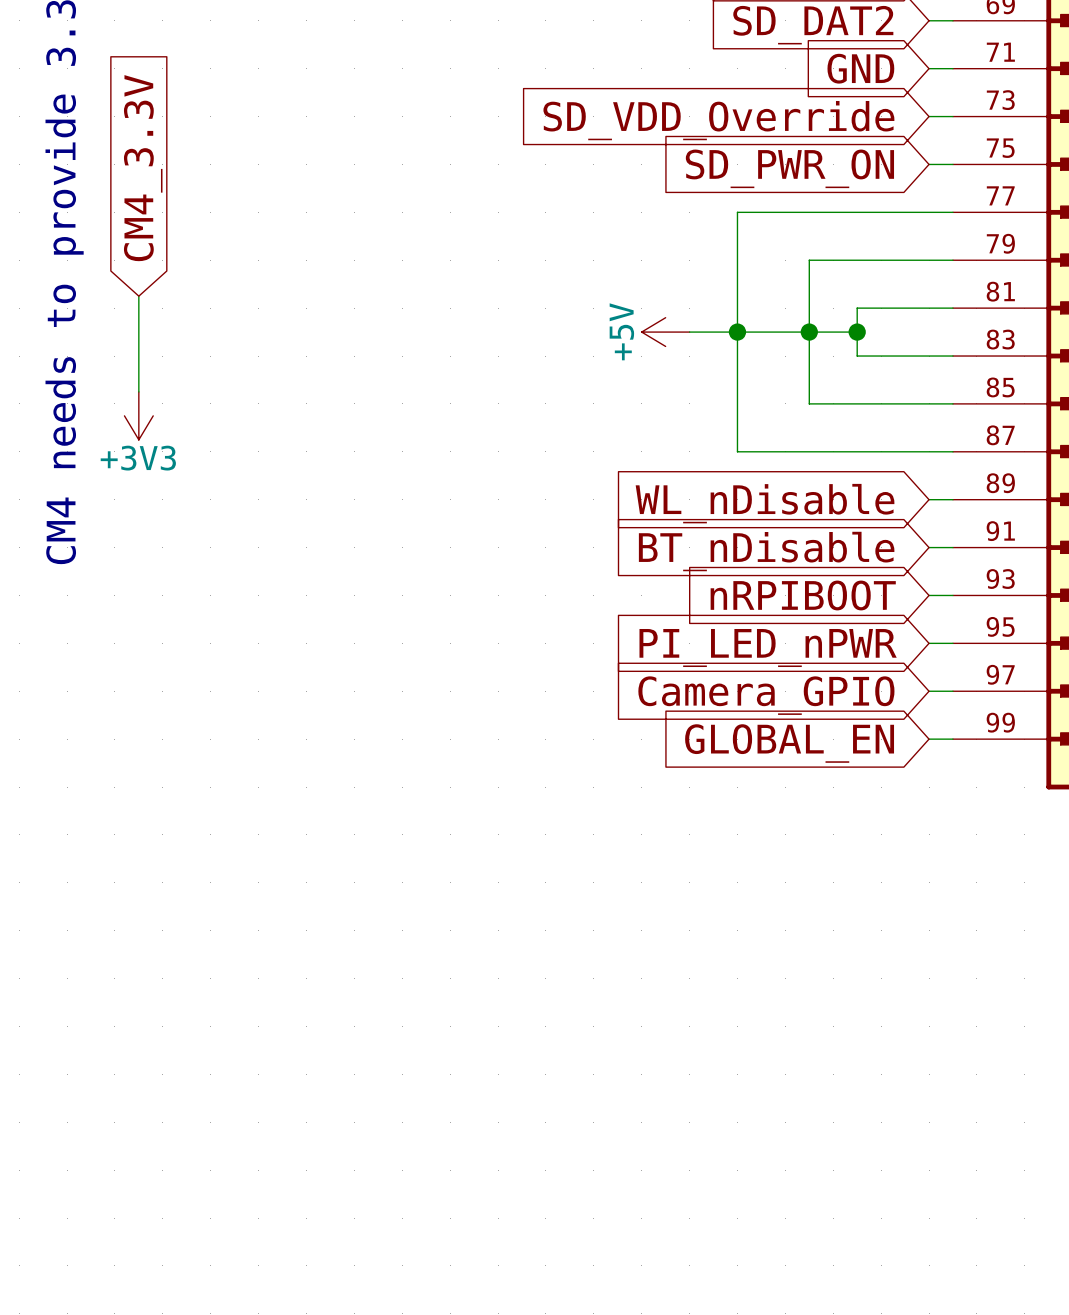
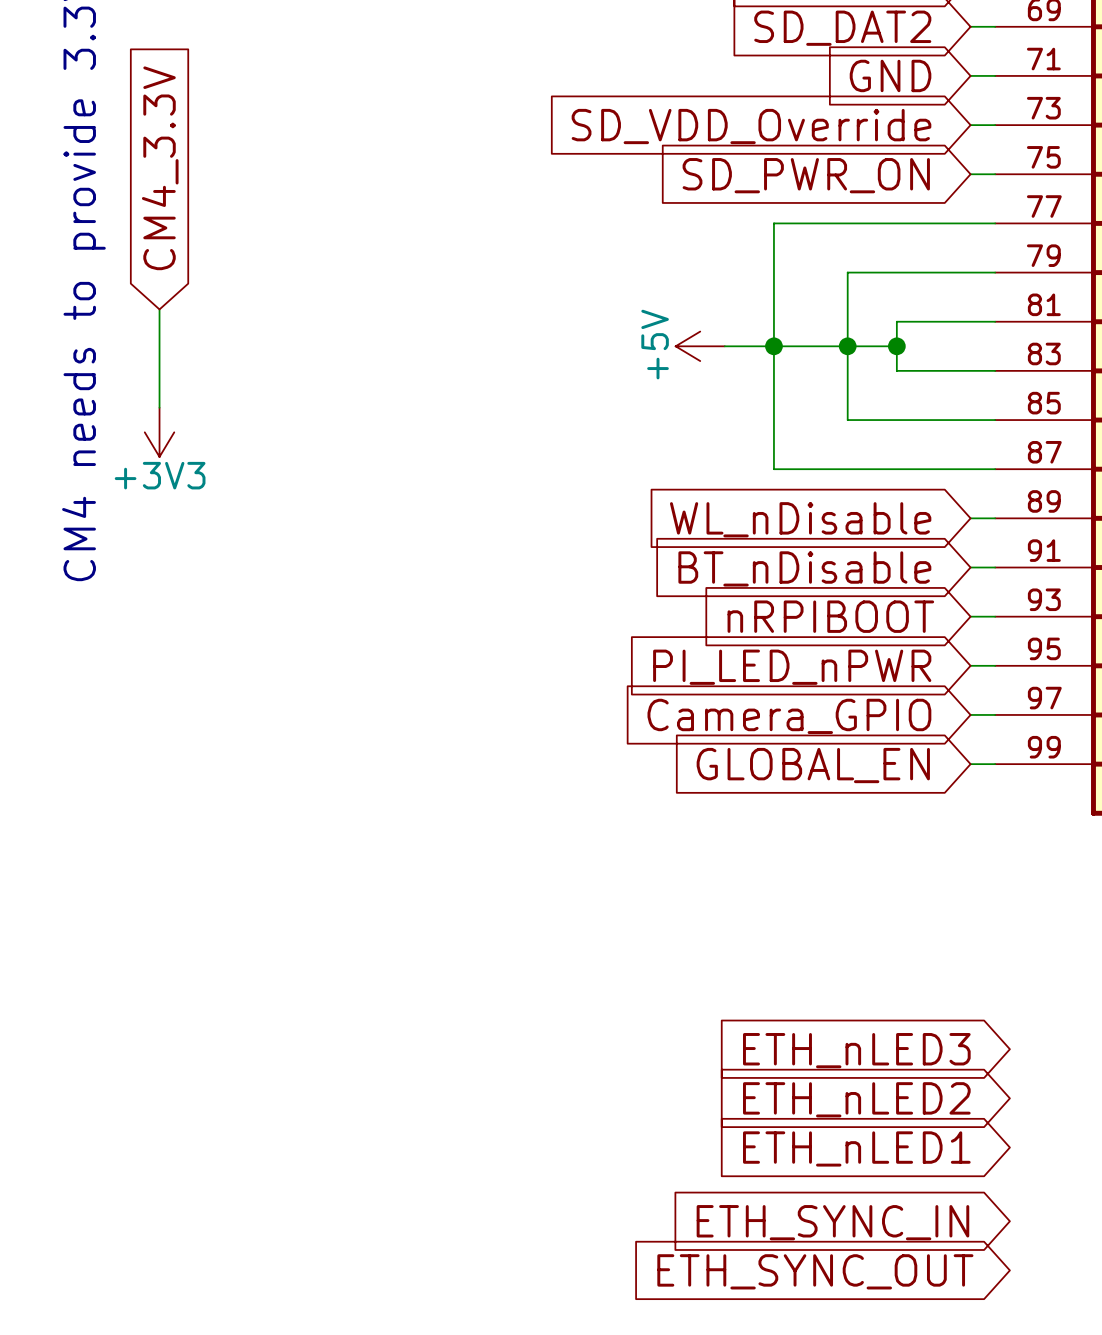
global label: none -> ETH_nLED3 (856, 1050)
global label: none -> ETH_nLED2 (856, 1099)
global label: none -> ETH_nLED1 (856, 1148)
global label: none -> ETH_SYNC_IN (832, 1222)
global label: none -> ETH_SYNC_OUT (815, 1271)

